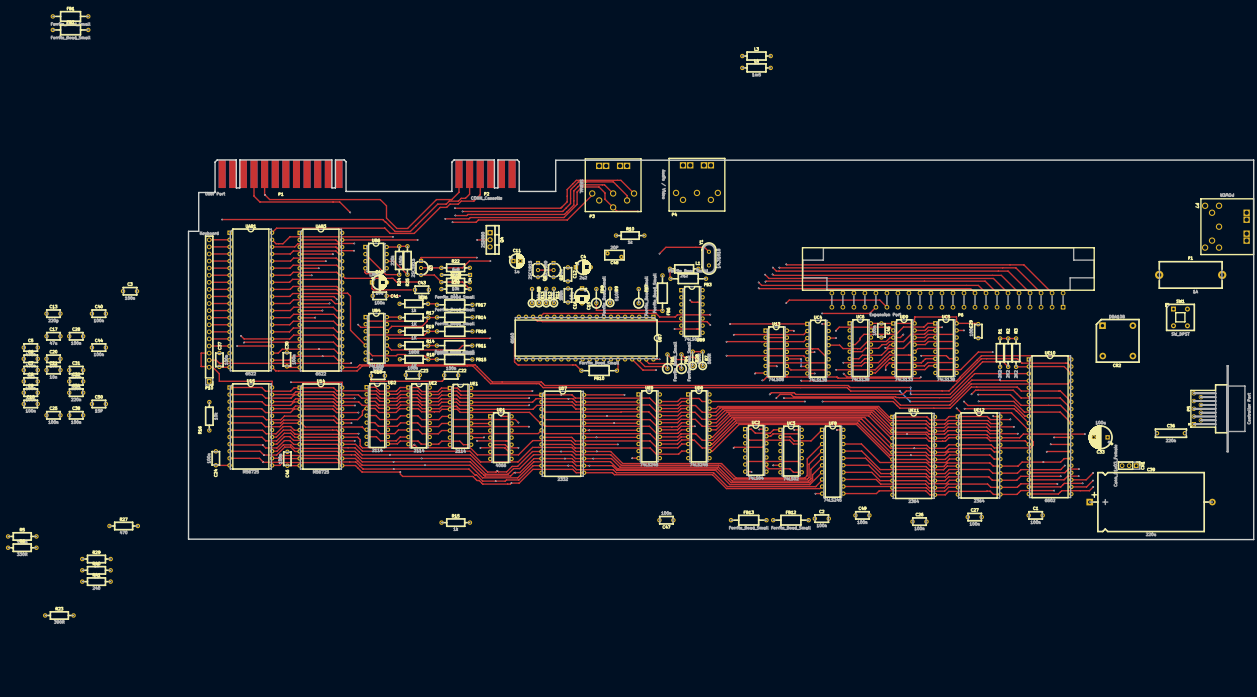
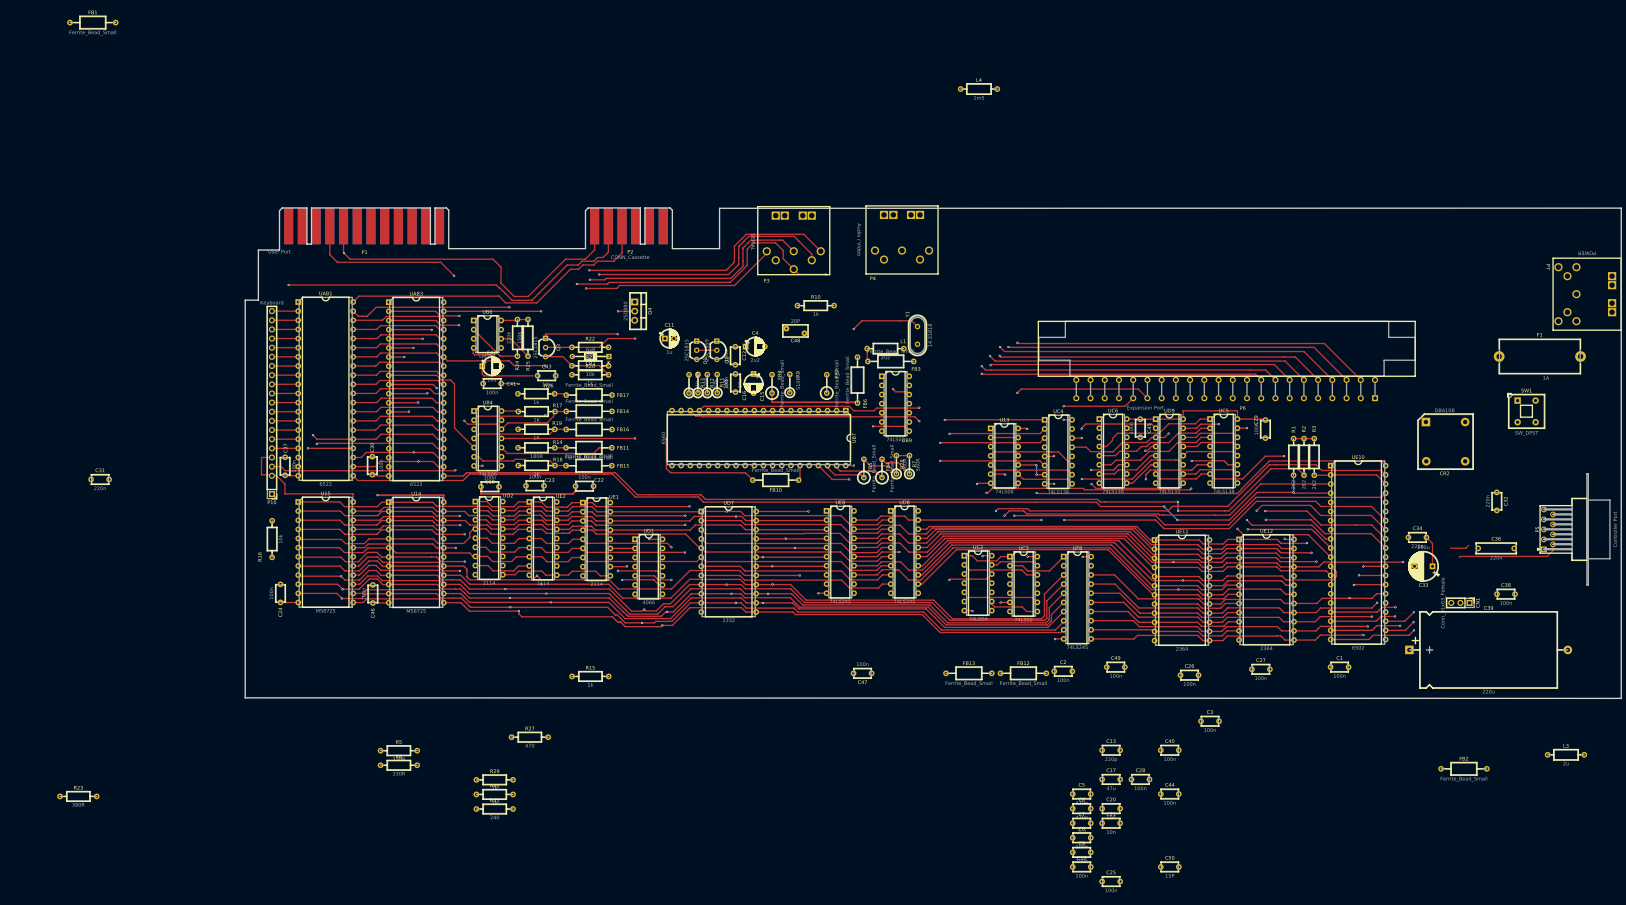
part position: (70, 29) -> (1463, 768)
part position: (756, 56) -> (1566, 754)
part position: (130, 291) -> (1210, 721)
part position: (53, 313) -> (1111, 750)
part position: (98, 313) -> (1169, 750)
part position: (53, 336) -> (1111, 779)
part position: (76, 336) -> (1140, 779)
part position: (30, 347) -> (1081, 794)
part position: (98, 347) -> (1169, 794)
part position: (30, 358) -> (1081, 808)
part position: (53, 358) -> (1111, 808)
part position: (30, 370) -> (1081, 823)
part position: (53, 370) -> (1111, 823)
part position: (30, 381) -> (1081, 837)
part rotation: 0° (76, 381) -> 90° clockwise (1496, 501)
part position: (76, 381) -> (1496, 501)
part position: (30, 392) -> (1081, 852)
part position: (76, 392) -> (1417, 537)
part position: (30, 403) -> (1081, 866)
part position: (98, 403) -> (1169, 866)
top track: none -> (1426, 537) (1432, 543) (1432, 566)
part position: (53, 415) -> (1111, 881)
part position: (76, 415) -> (1506, 594)
top track: none -> (1553, 544) (1553, 550) (1547, 556) (1459, 557)
top track: none -> (1468, 545) (1465, 548) (1450, 548)
part position: (1170, 433) -> (1496, 548)
part position: (123, 525) -> (529, 737)
part position: (22, 536) -> (398, 750)
part position: (22, 547) -> (398, 765)
part position: (96, 559) -> (494, 779)
part position: (96, 570) -> (494, 794)
part position: (96, 581) -> (494, 809)

